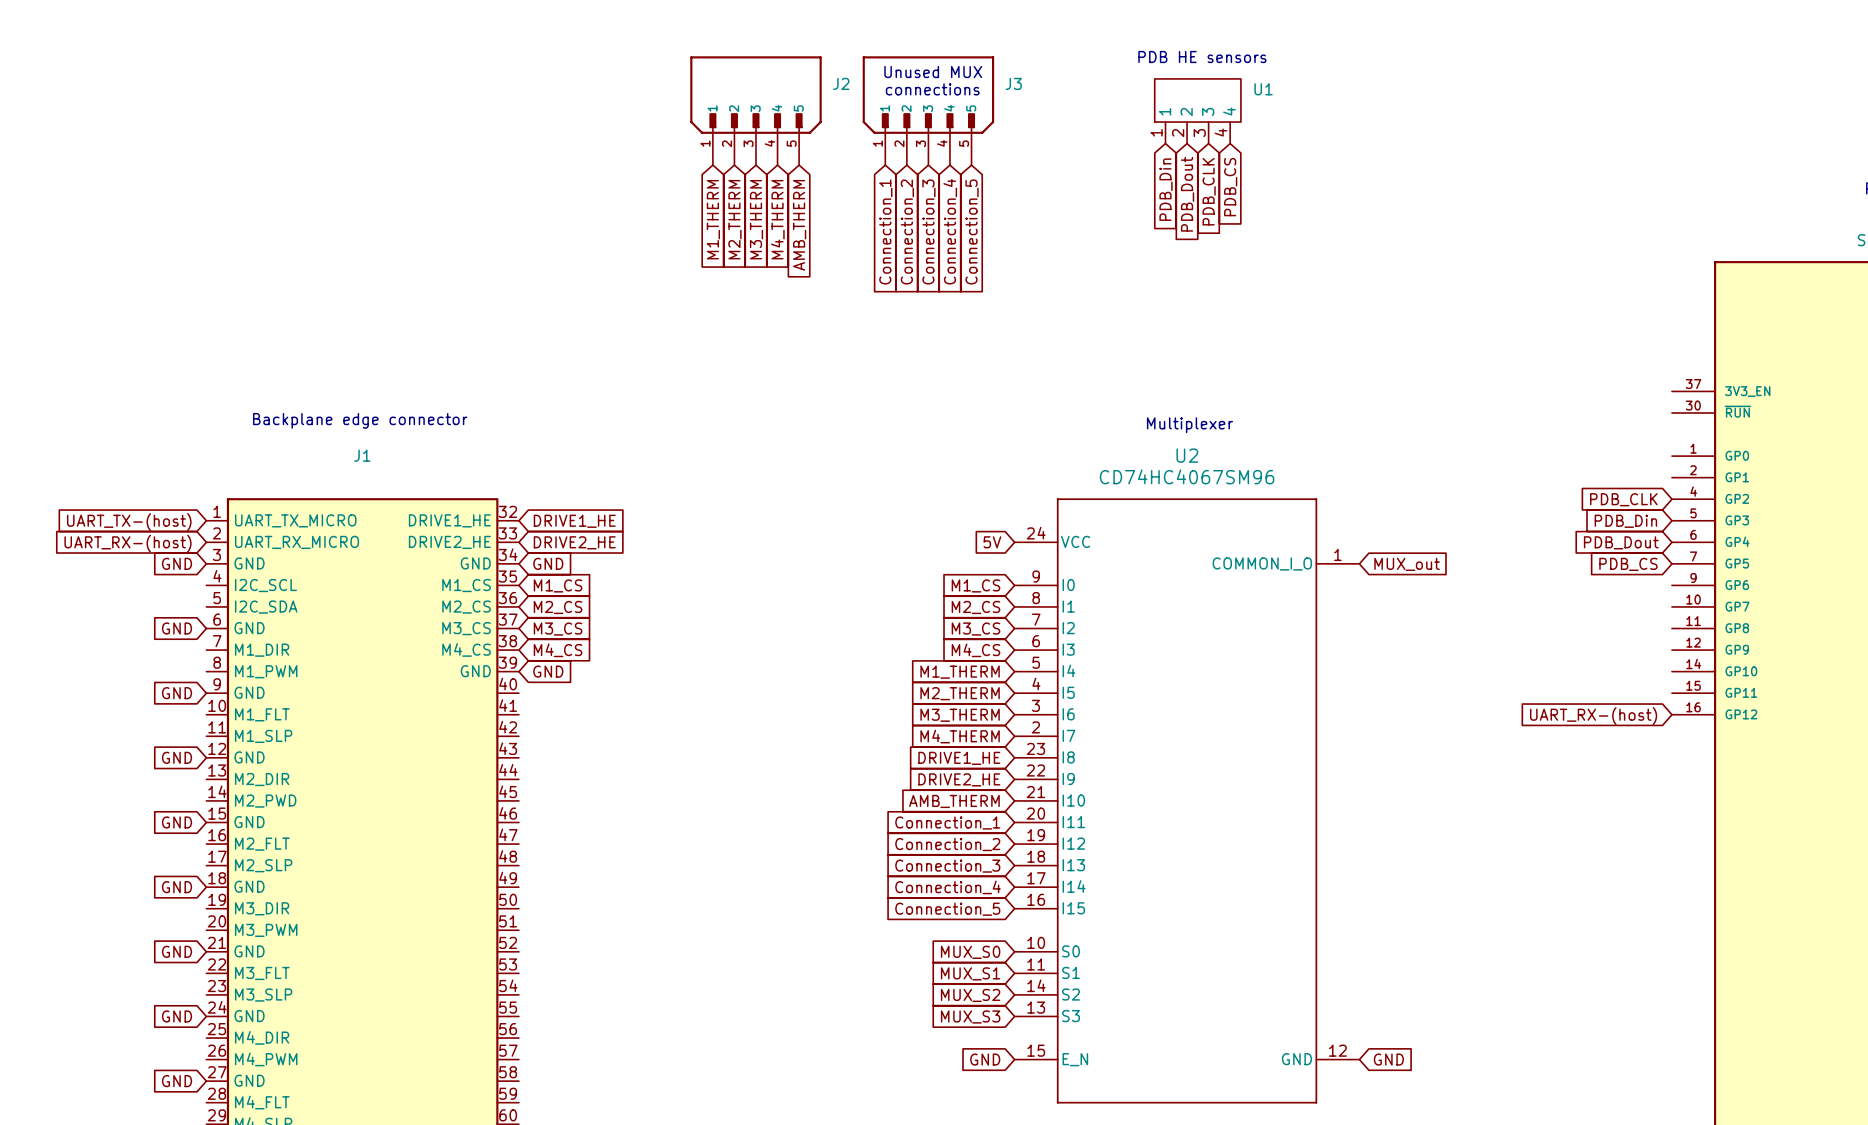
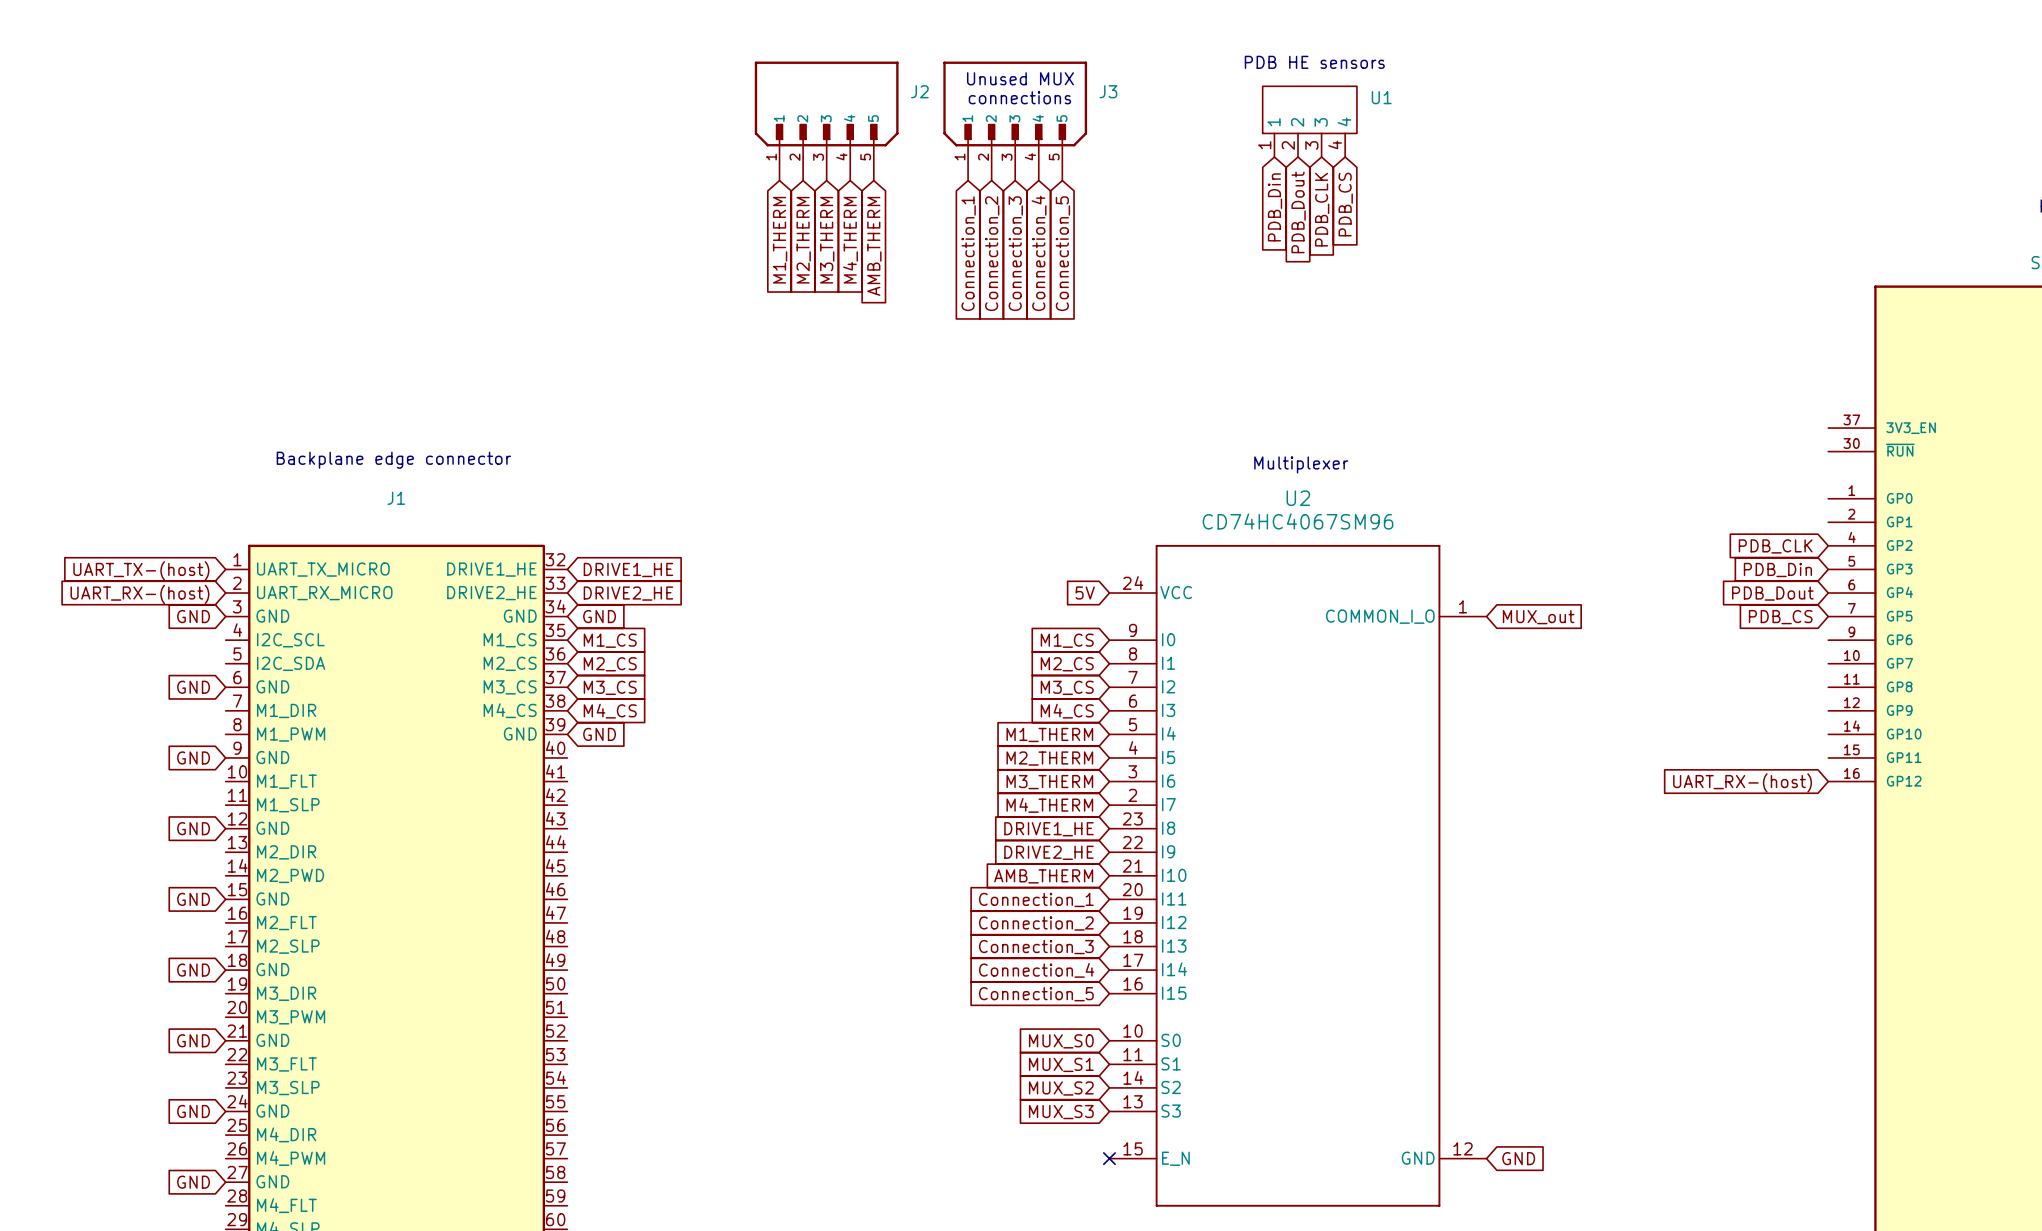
global label: GND (985, 1059) -> none
no-connect mark: none -> (1109, 1158)

